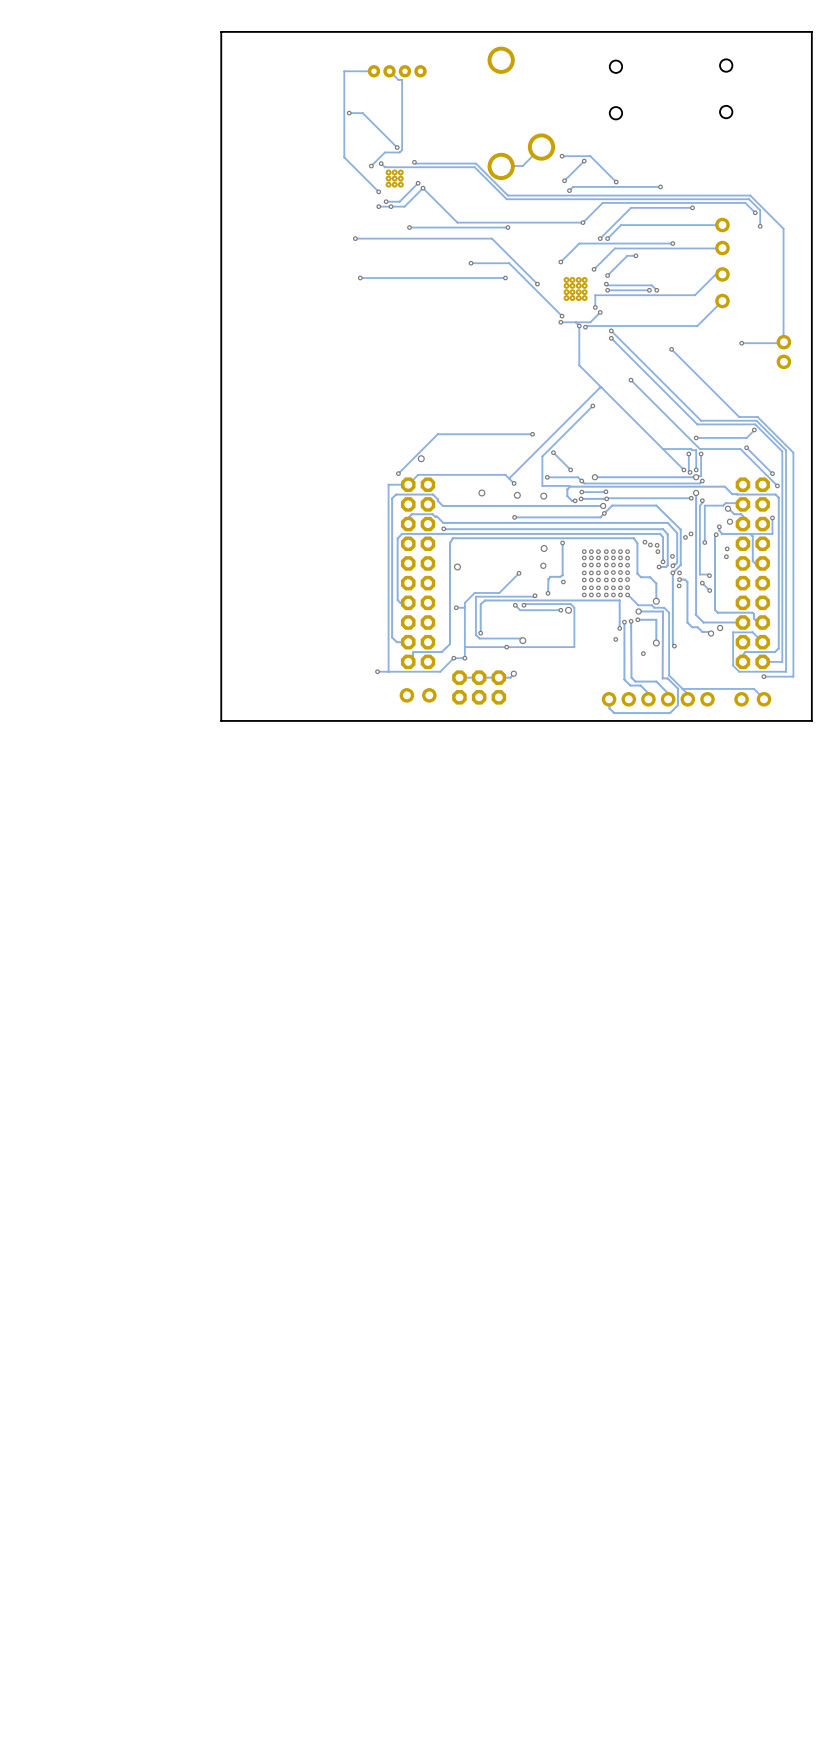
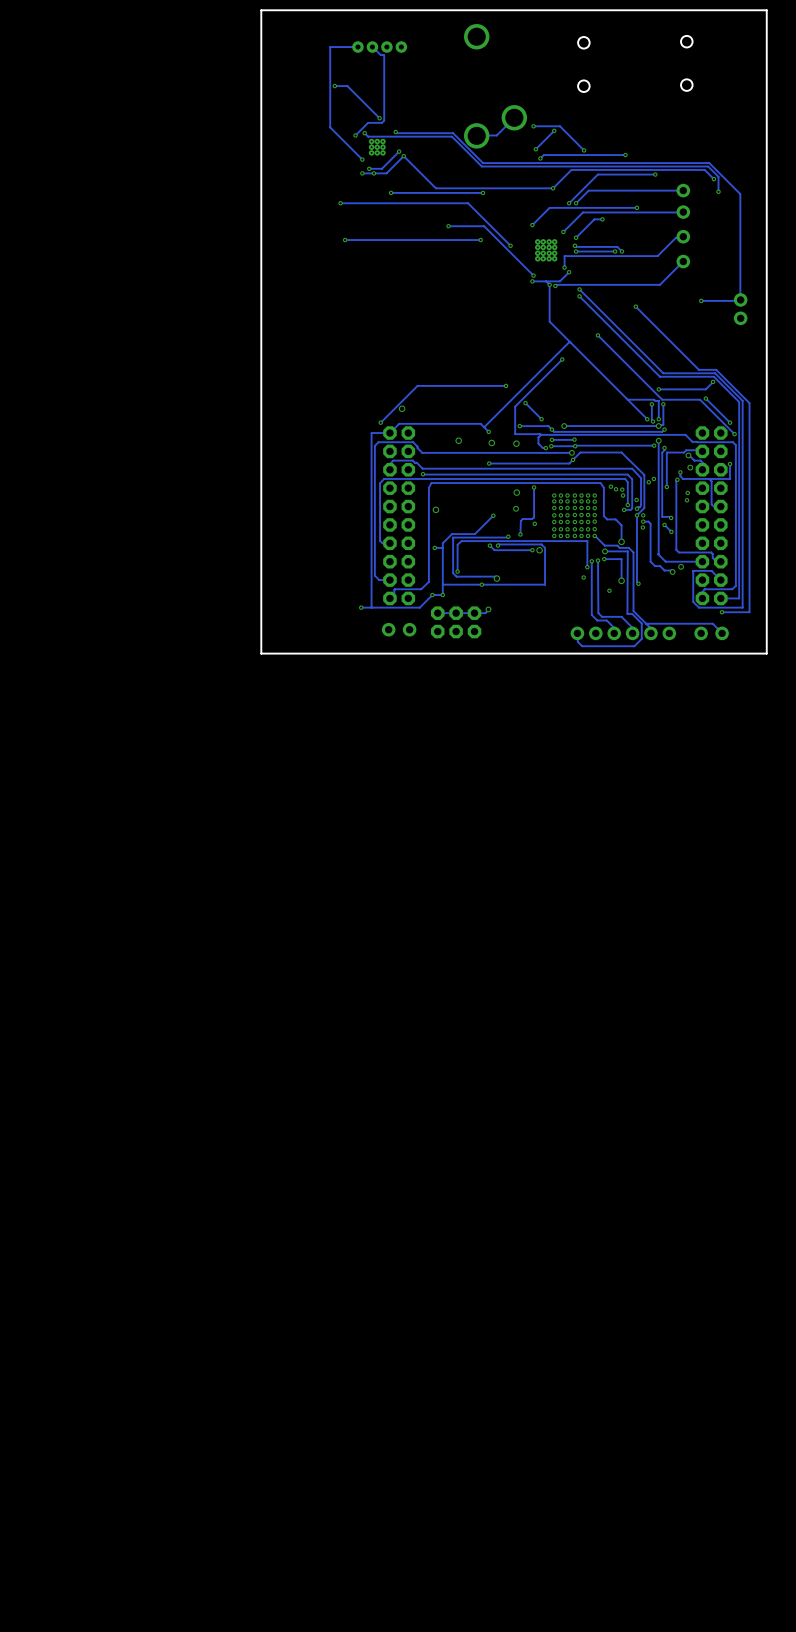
board edge: (270, 31) (221, 31) (221, 720) (270, 720) -> (261, 10) (261, 653)

